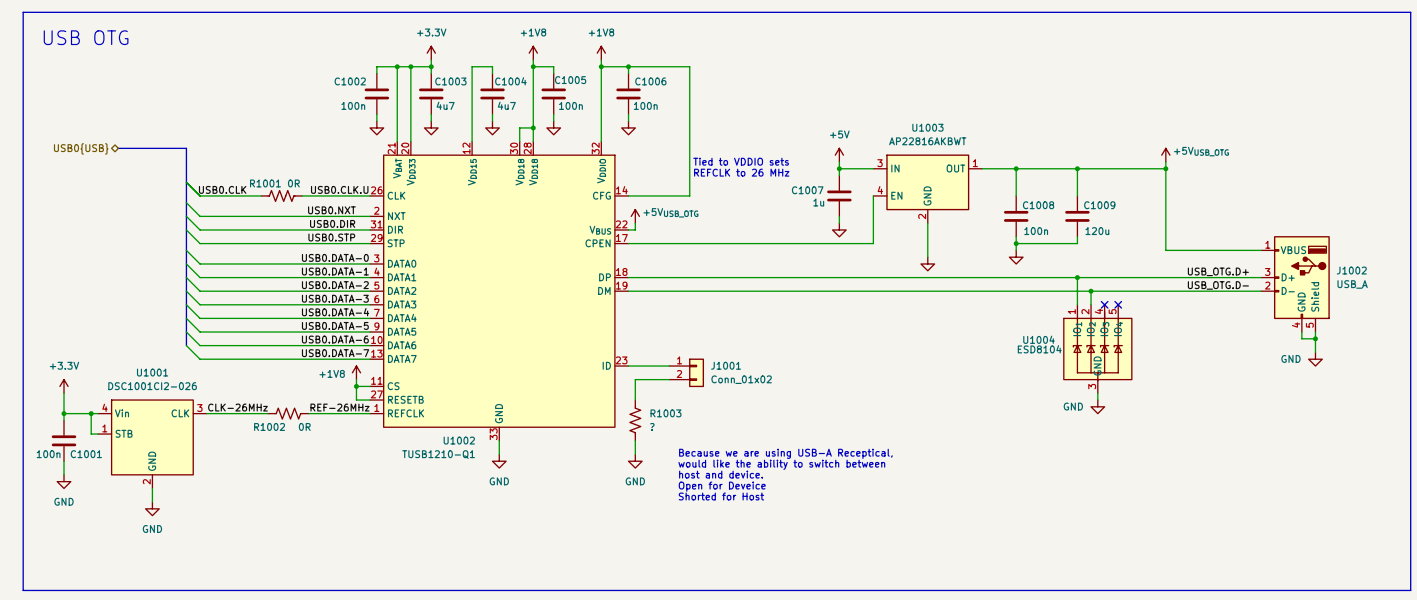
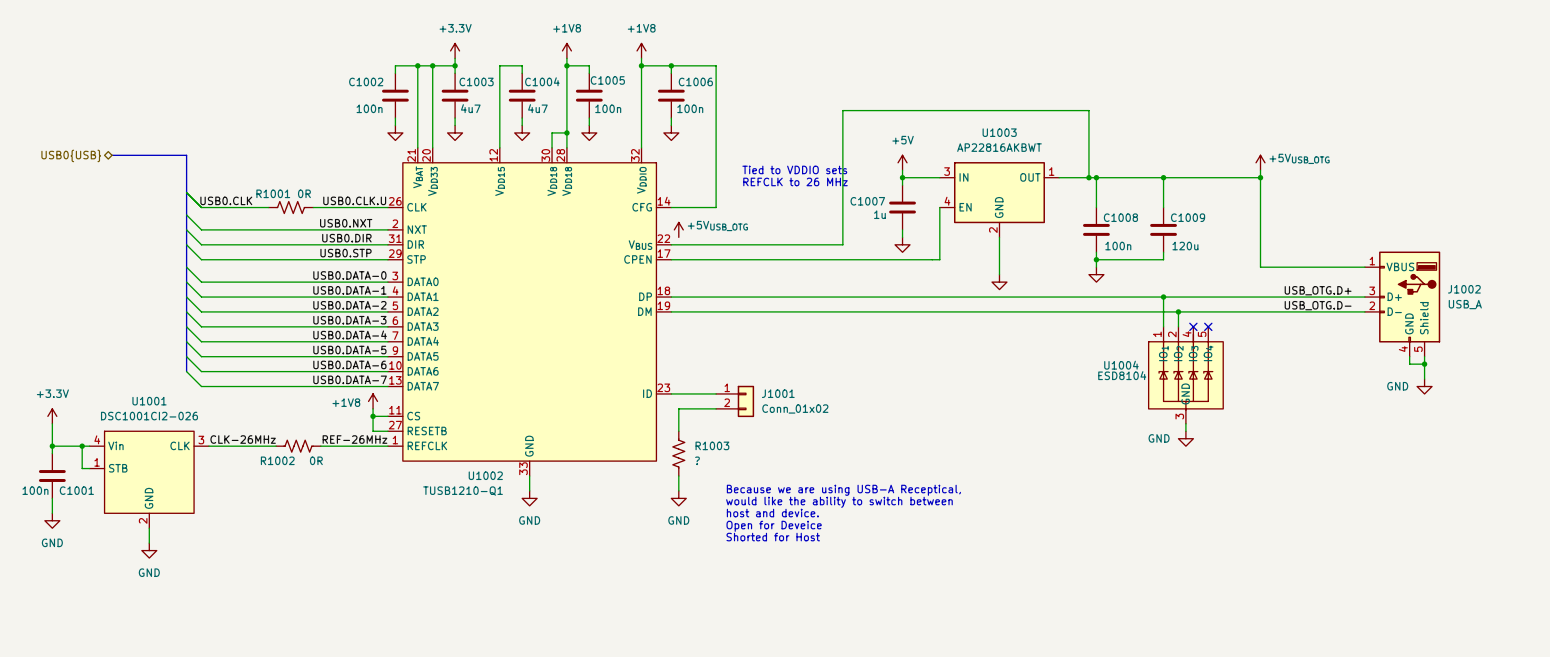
line: (23, 12) (1410, 12) (1410, 590) (23, 590) (23, 12) -> none
text: USB OTG (86, 37) -> none
wire: (669, 66) (689, 66) (689, 195) (669, 195) -> (716, 65) (716, 207)
junction: none -> (1088, 177)
wire: (635, 223) (635, 229) -> (1088, 177) (1088, 110) (842, 110) (842, 244) (678, 244)

